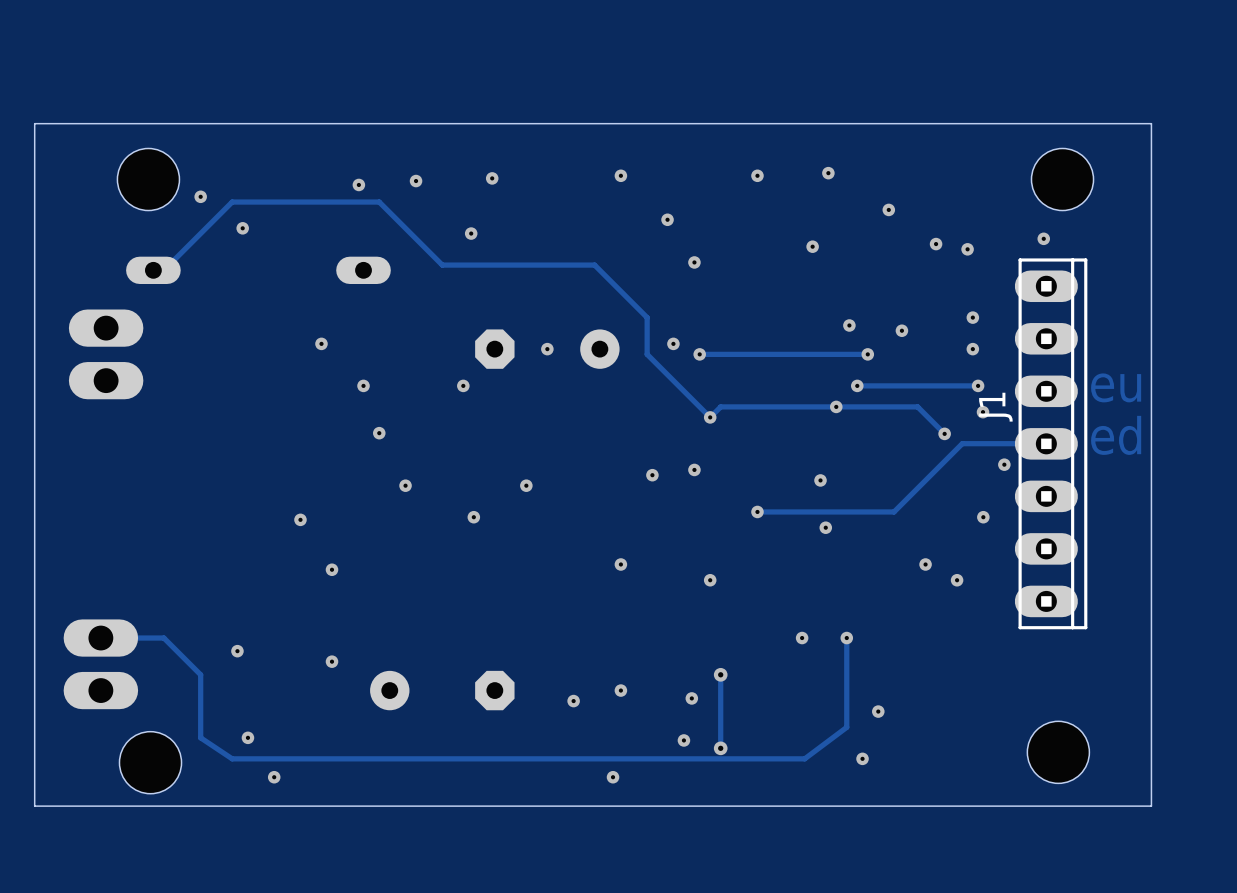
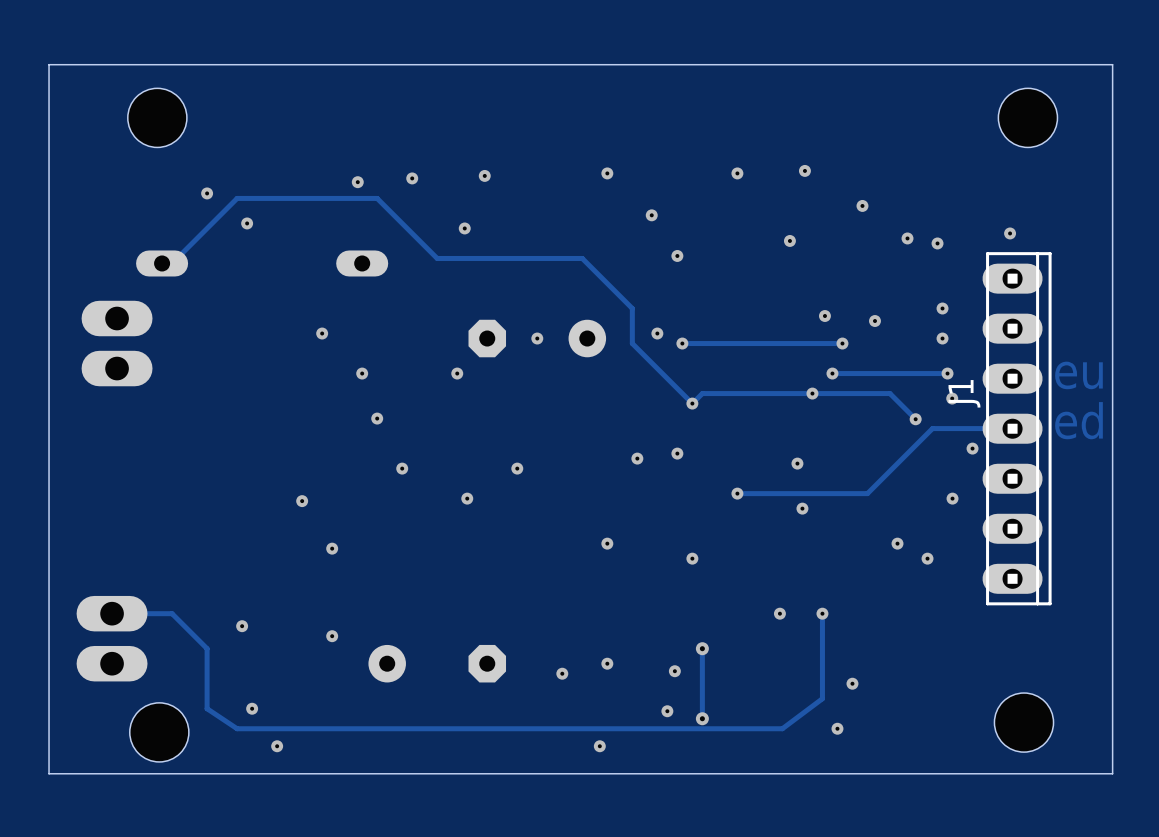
board edge: (1151, 123) (34, 123) -> (1112, 123) (1112, 64) (49, 64) (49, 123)
hole position: (148, 179) -> (157, 117)
hole position: (1062, 179) -> (1027, 117)

